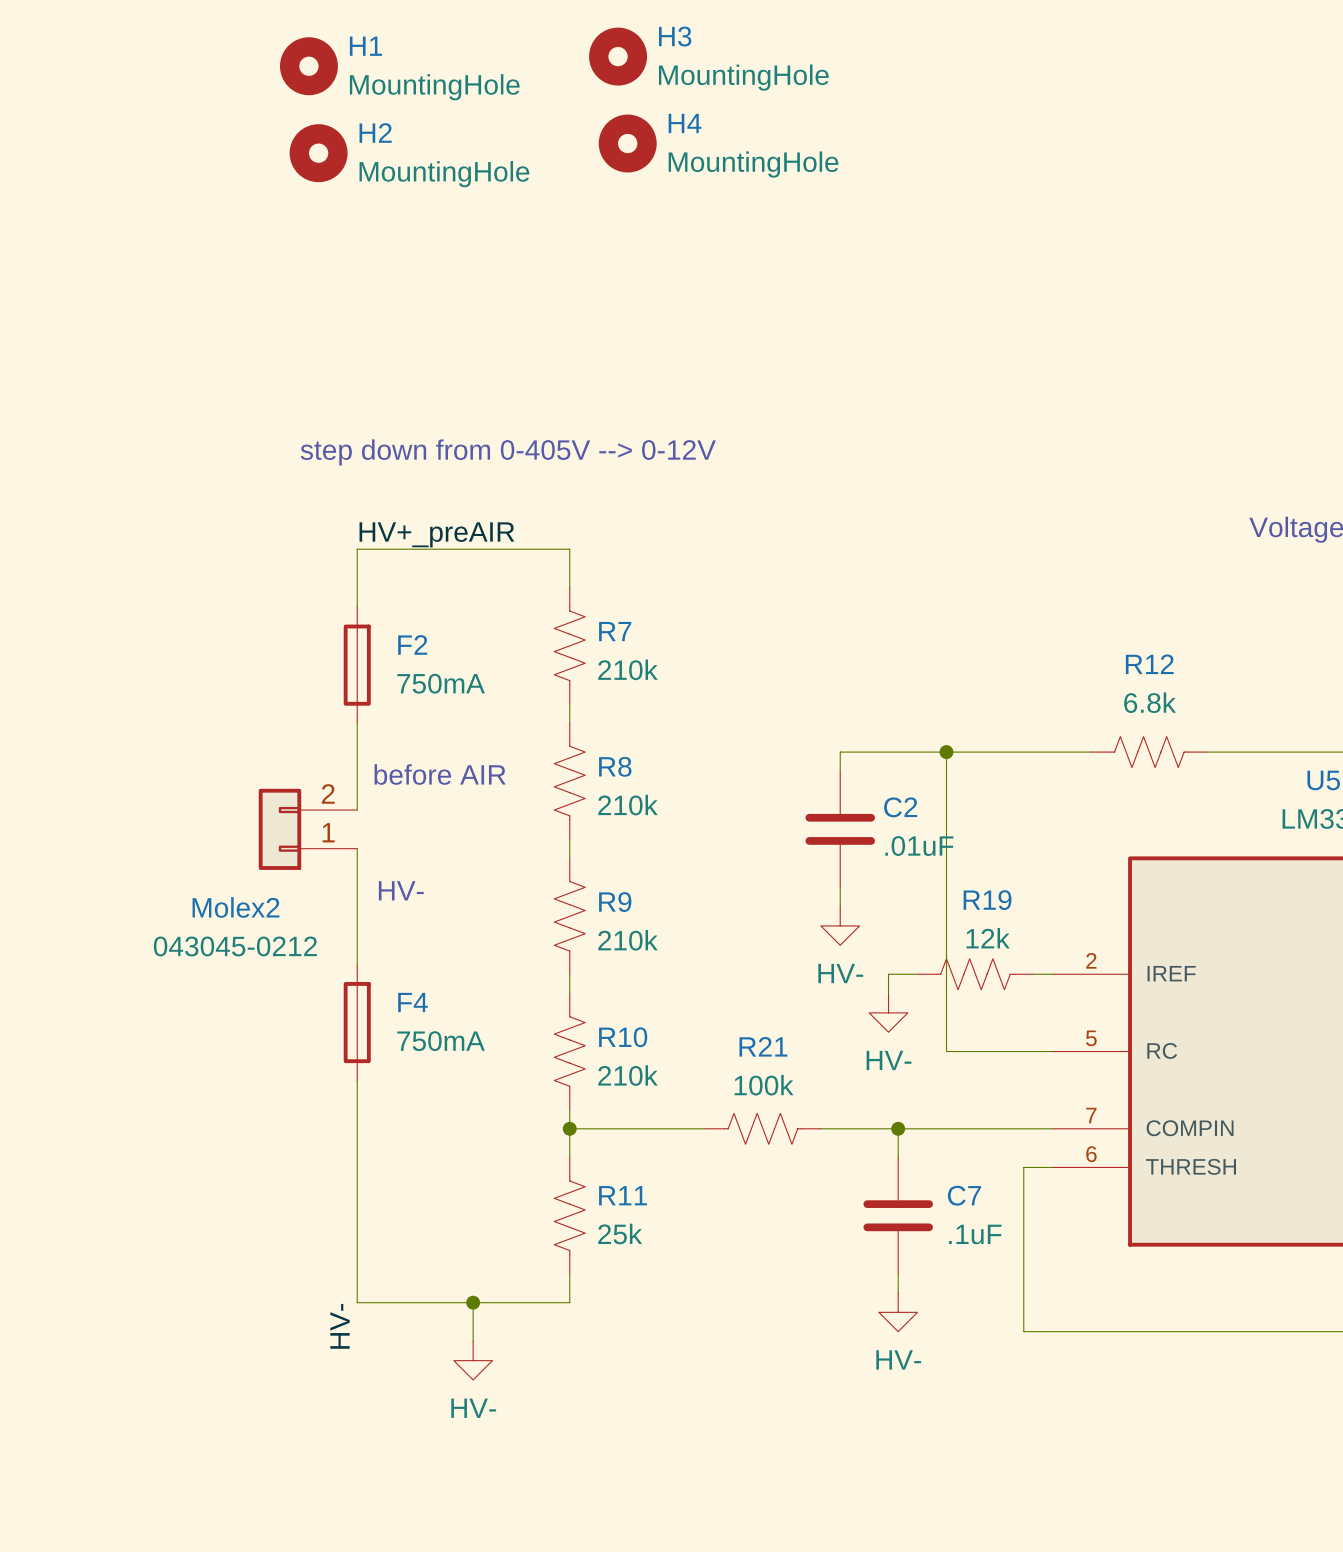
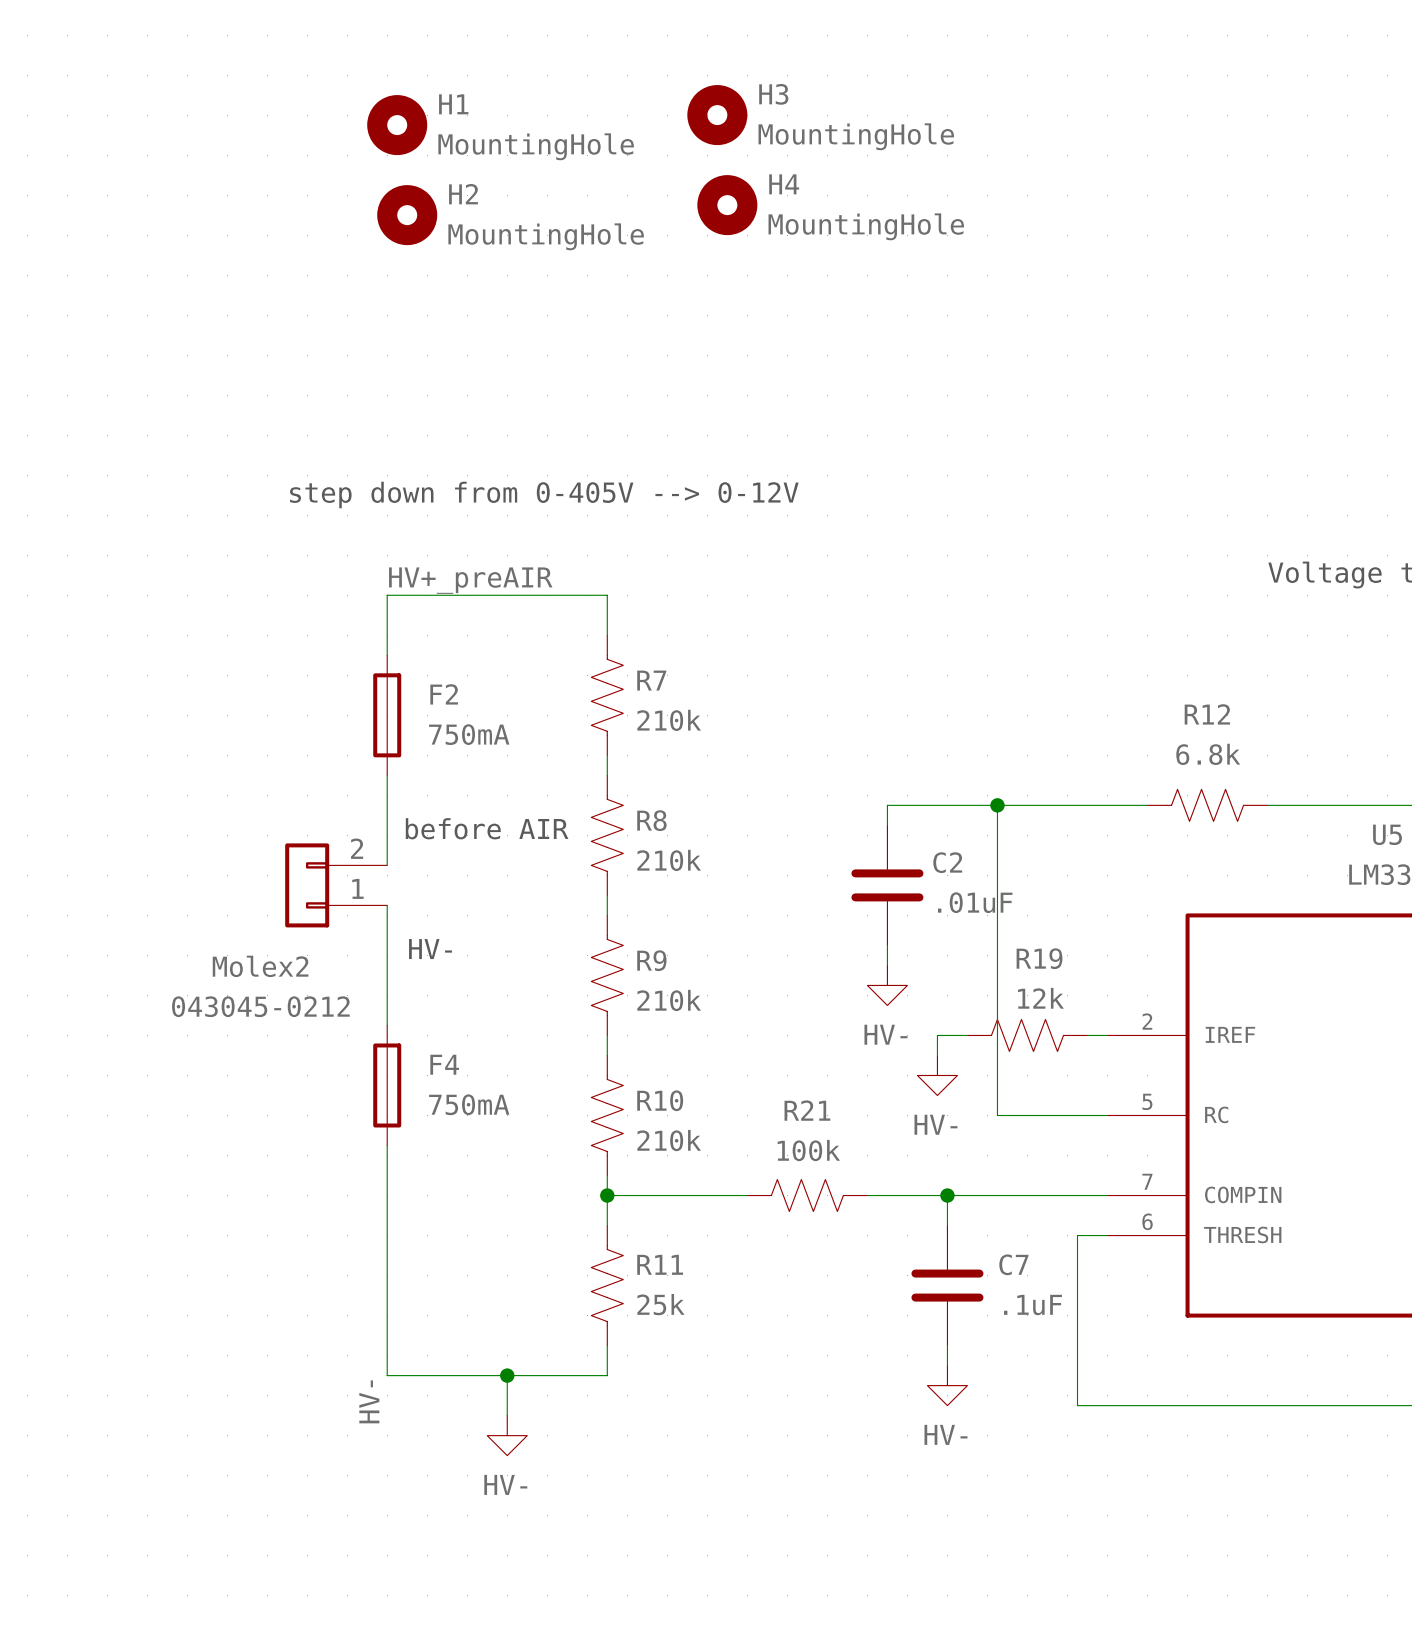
H3 position: (618, 56) -> (717, 115)
H1 position: (308, 66) -> (397, 125)
H4 position: (627, 143) -> (727, 205)
H2 position: (318, 153) -> (407, 215)

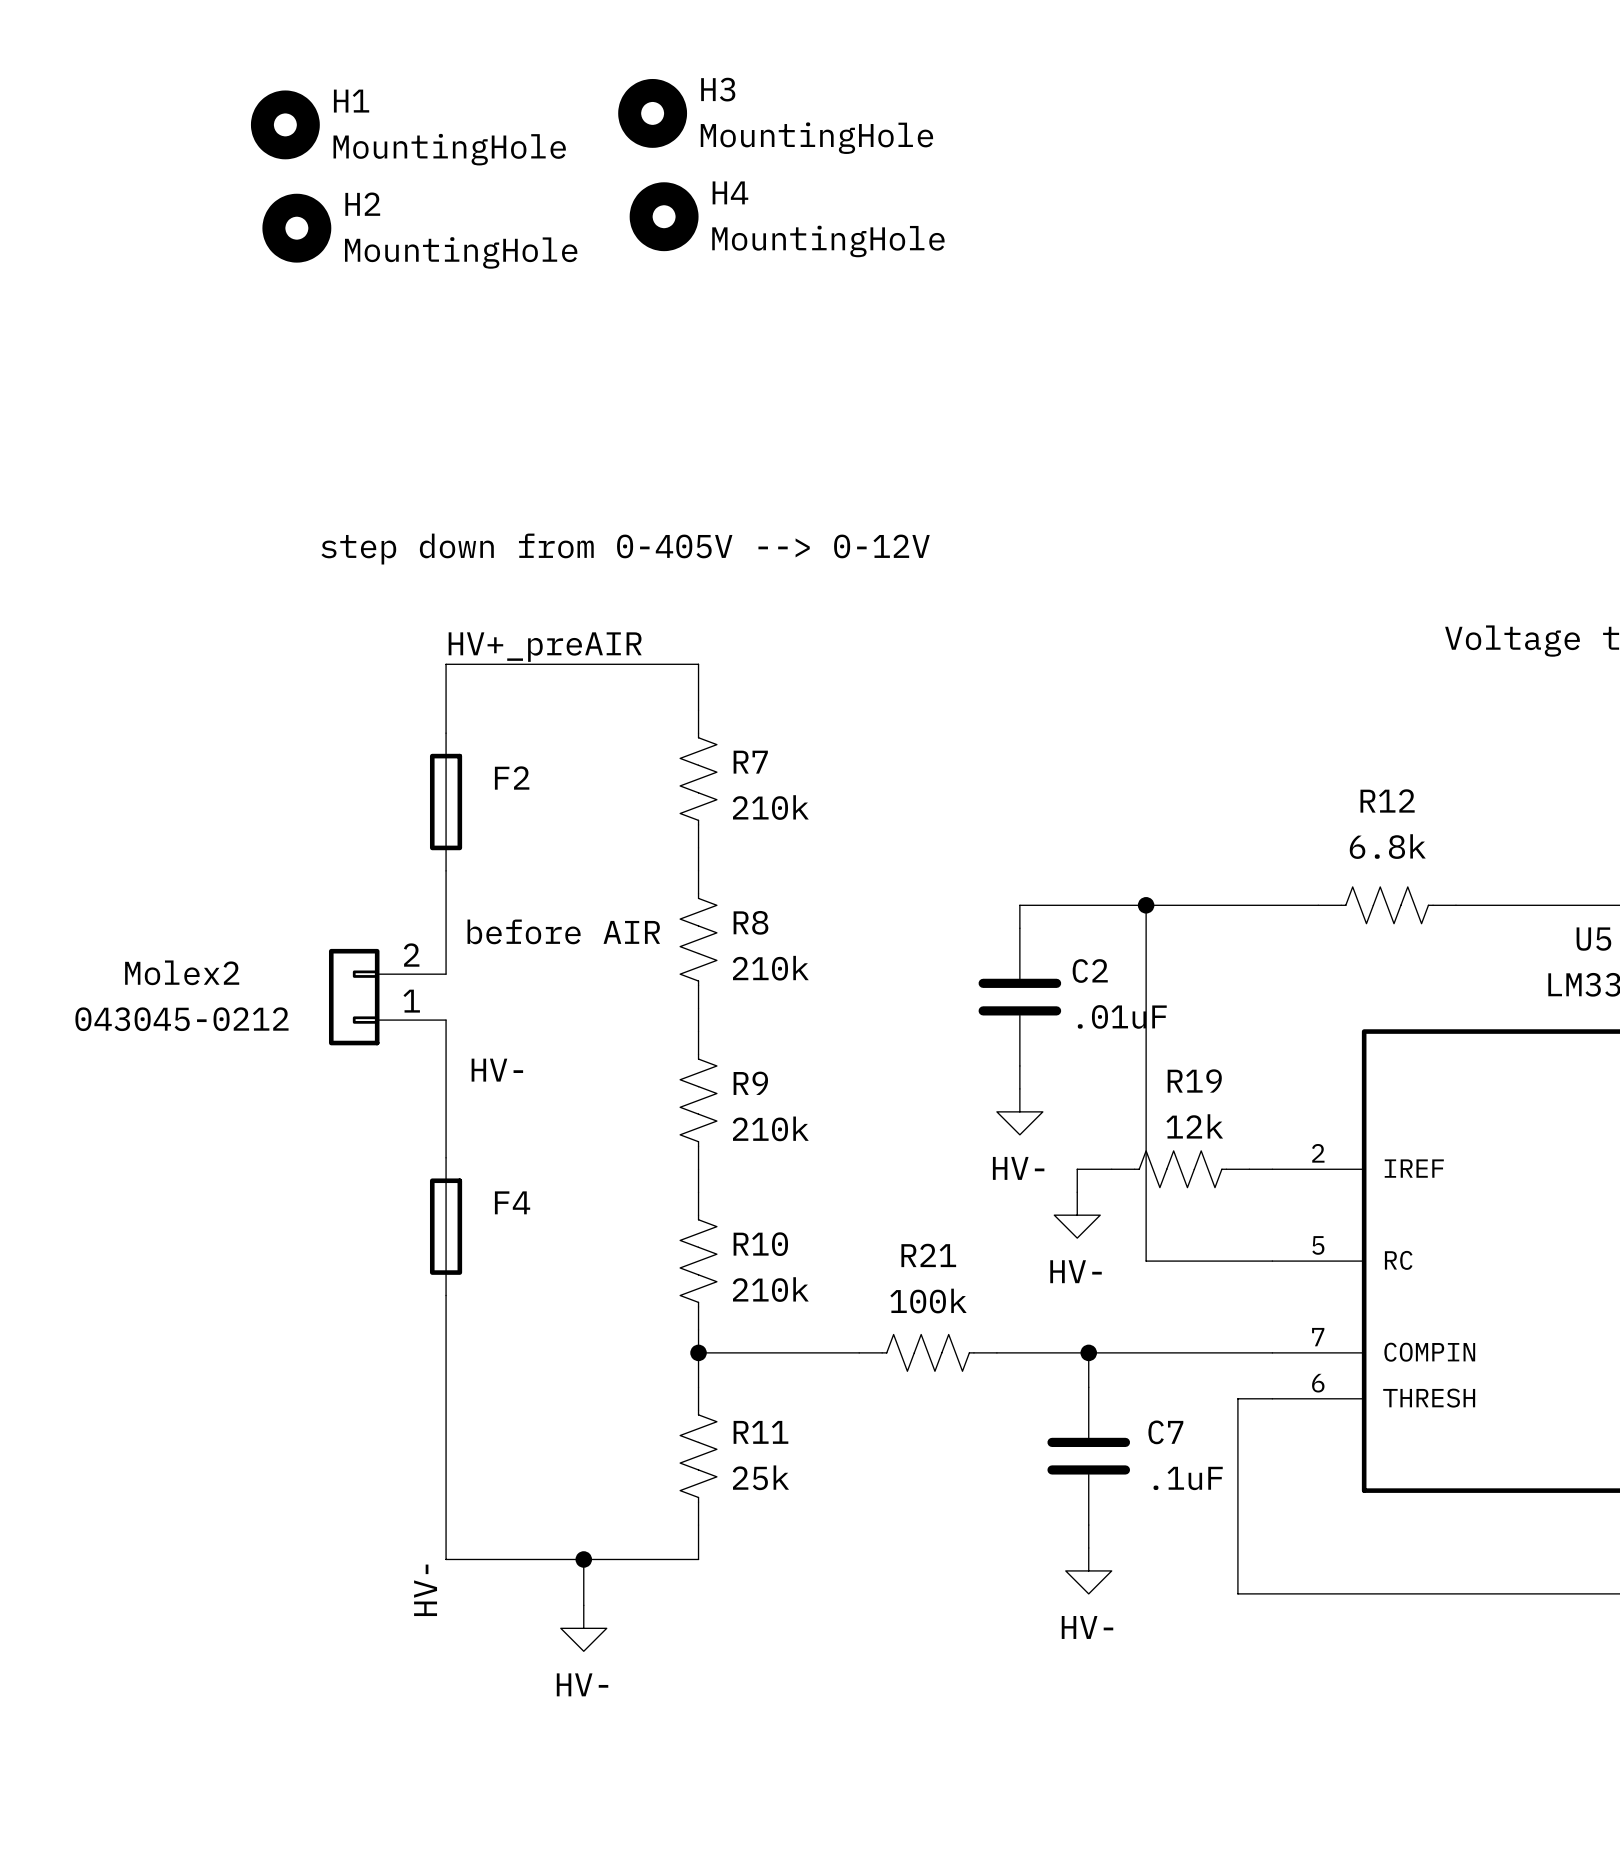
H3 position: (717, 115) -> (652, 113)
H1 position: (397, 125) -> (285, 124)
H4 position: (727, 205) -> (664, 216)
H2 position: (407, 215) -> (296, 228)
F2 value: 750mA (469, 734) -> none
Molex2 name position: Molex2 (260, 966) -> Molex2 (182, 972)
Molex2 value position: 043045-0212 (260, 1006) -> 043045-0212 (181, 1019)
F4 value: 750mA (469, 1104) -> none

